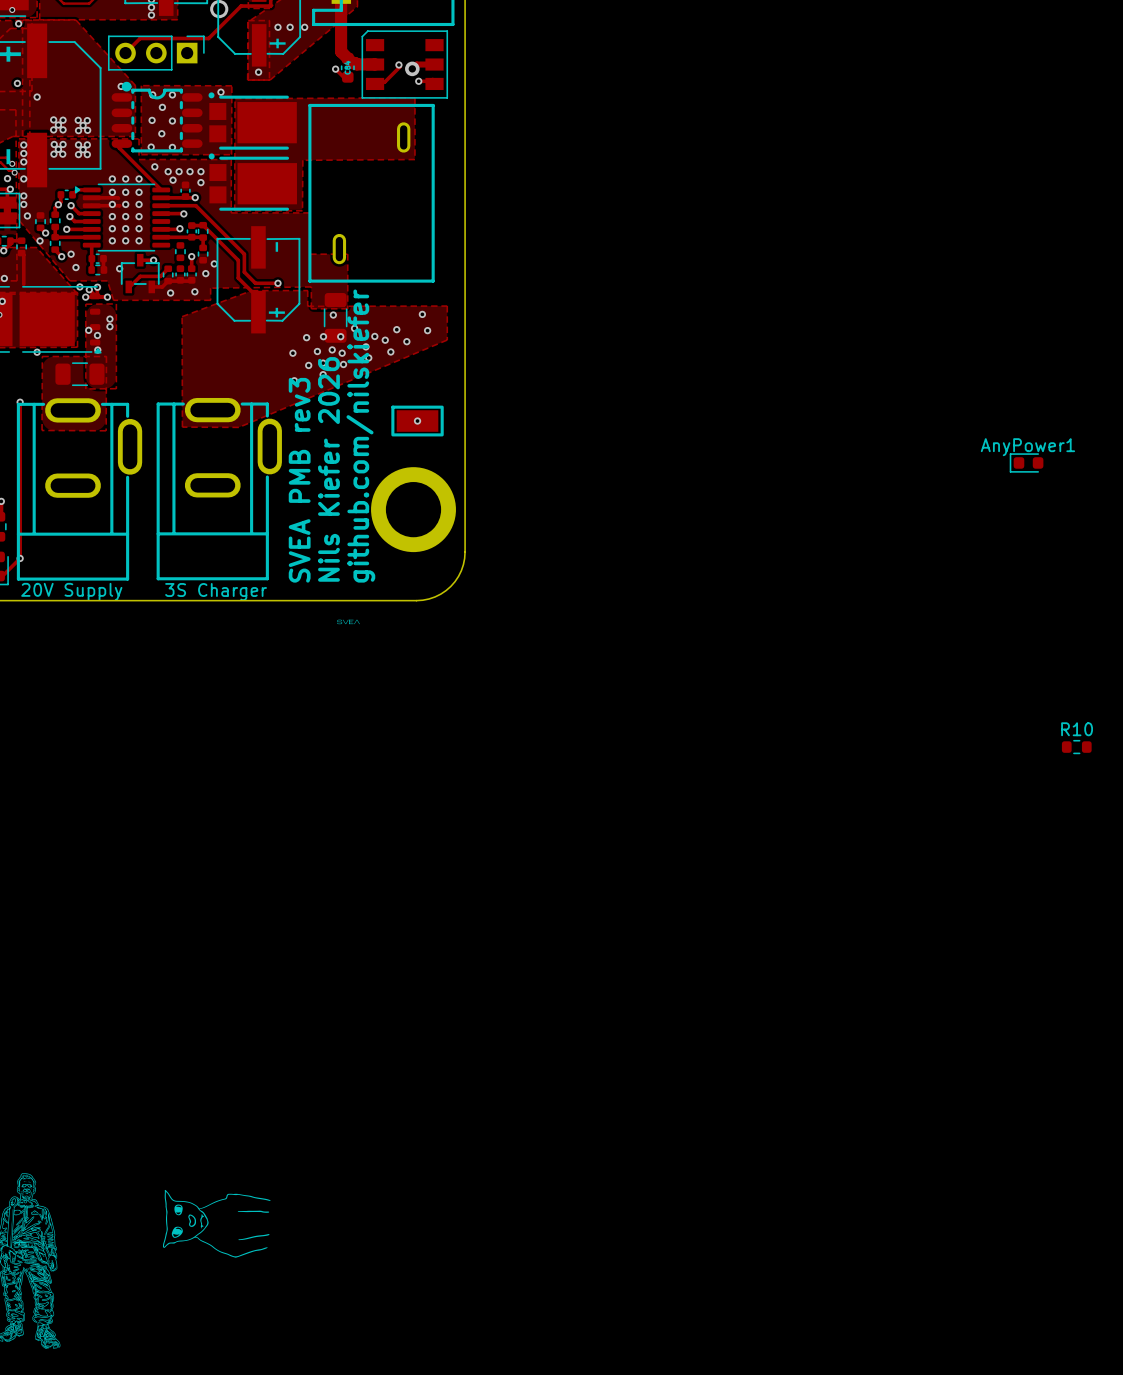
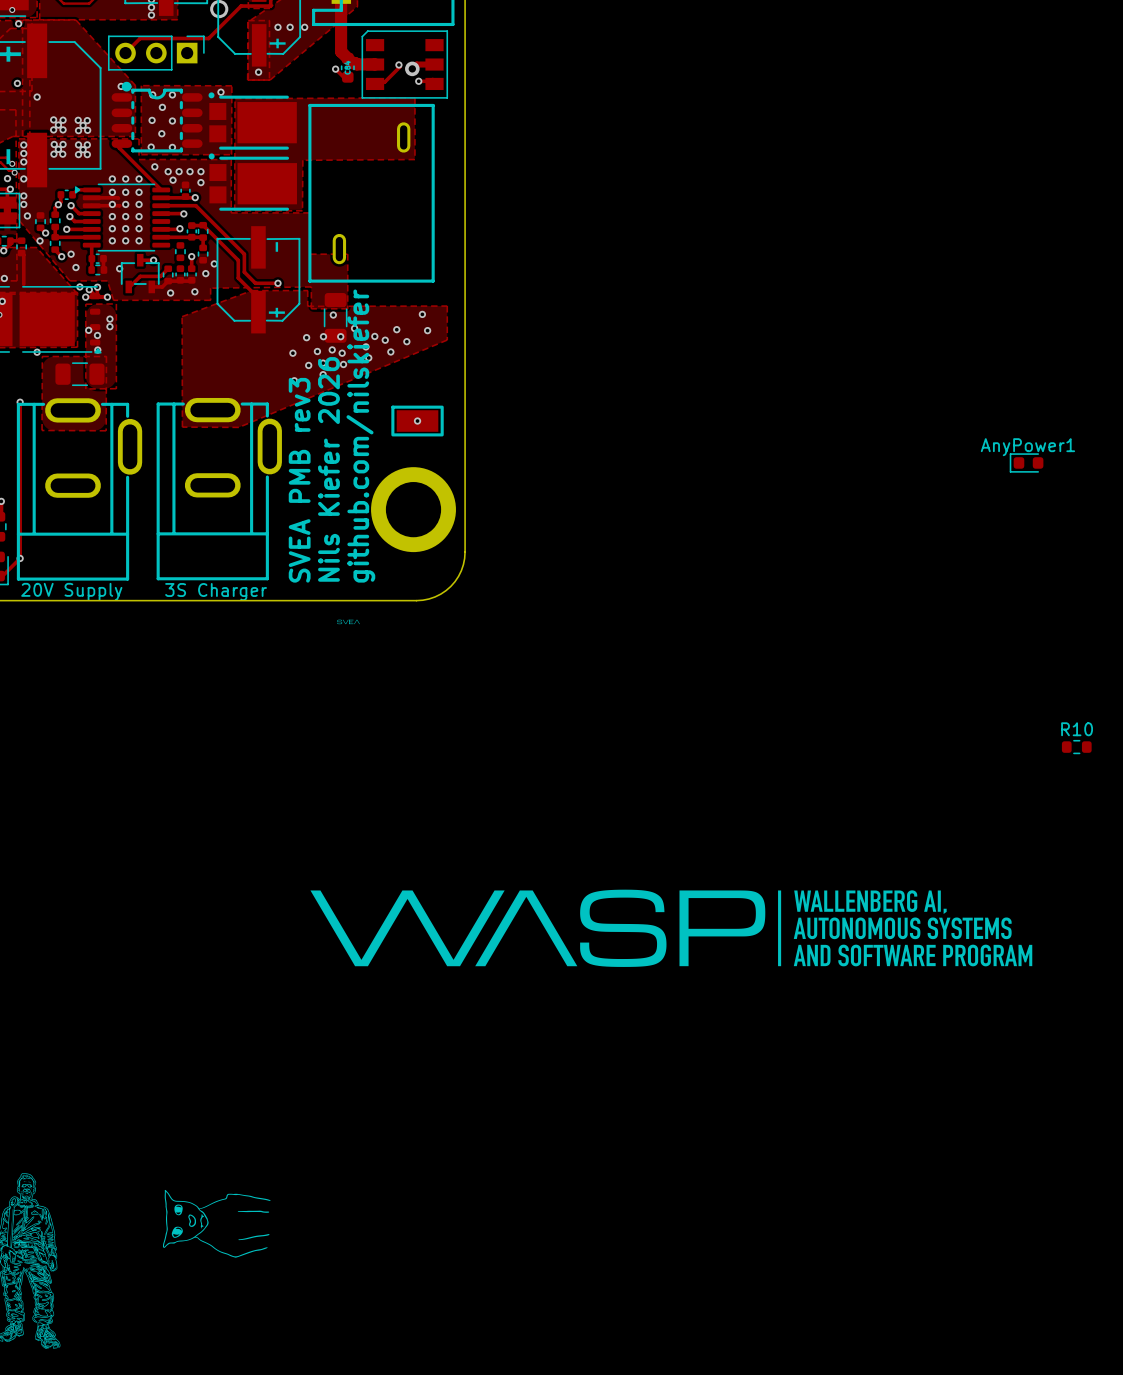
drawing: none -> [310, 889, 1033, 967]

